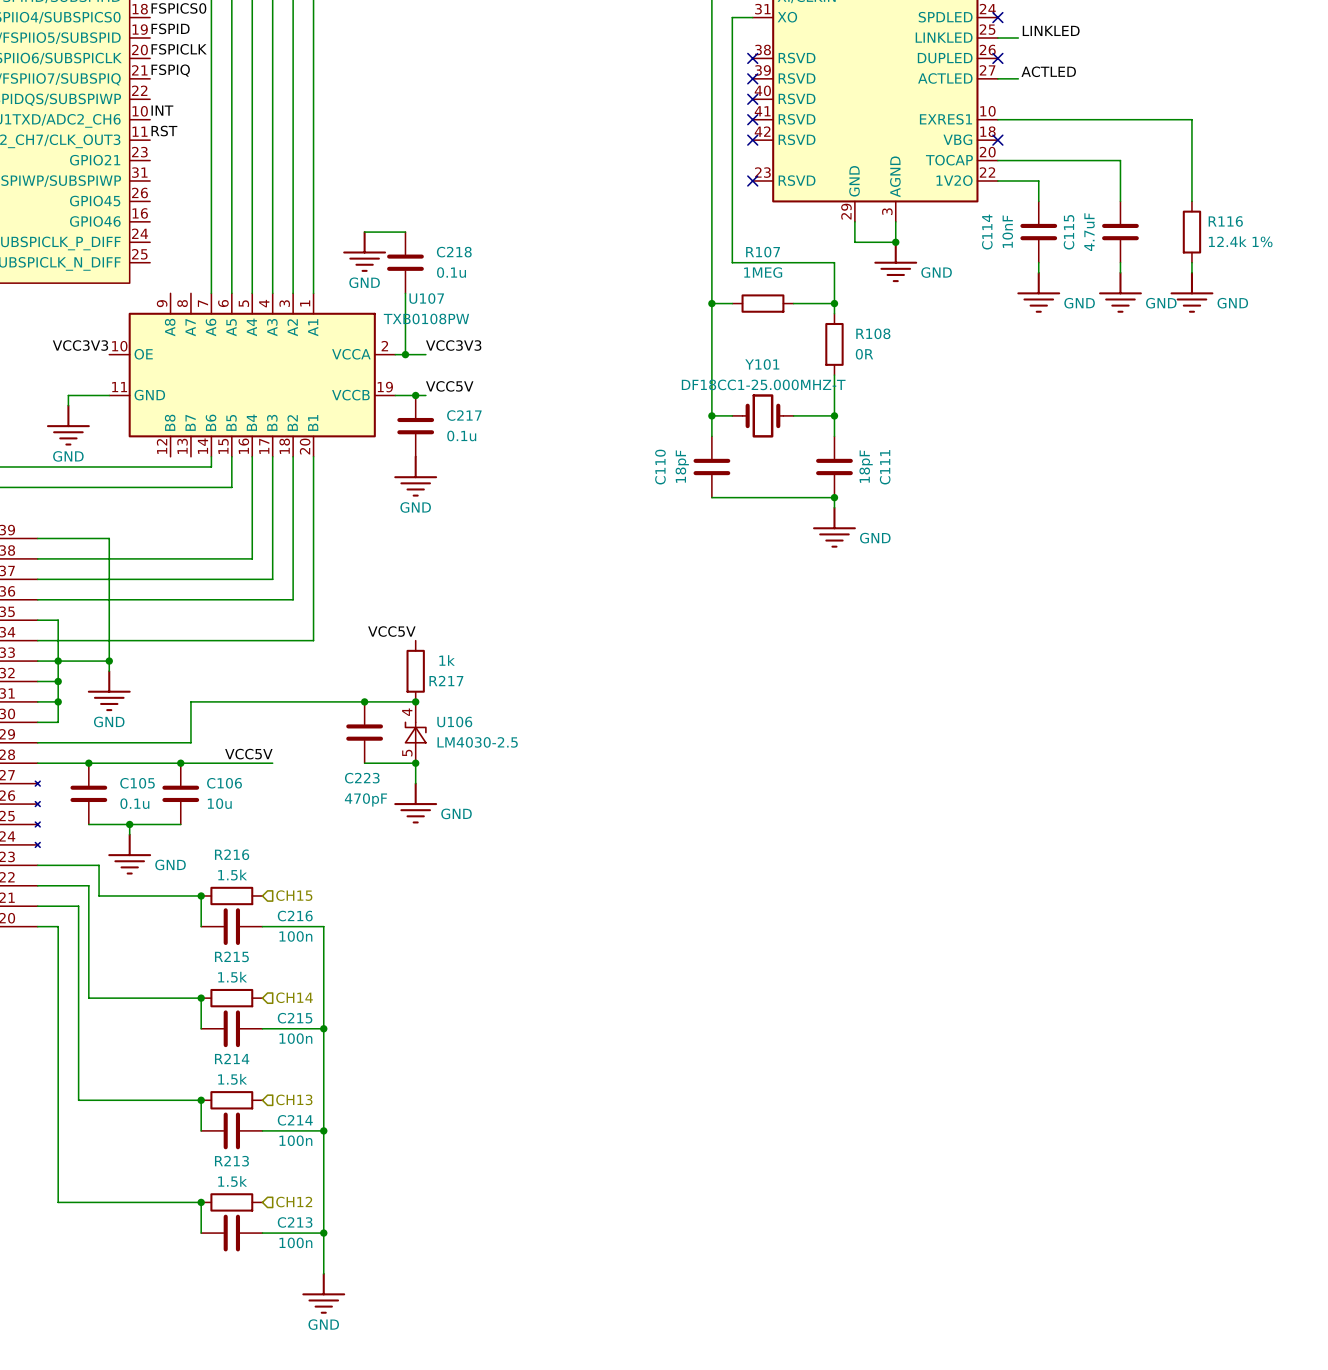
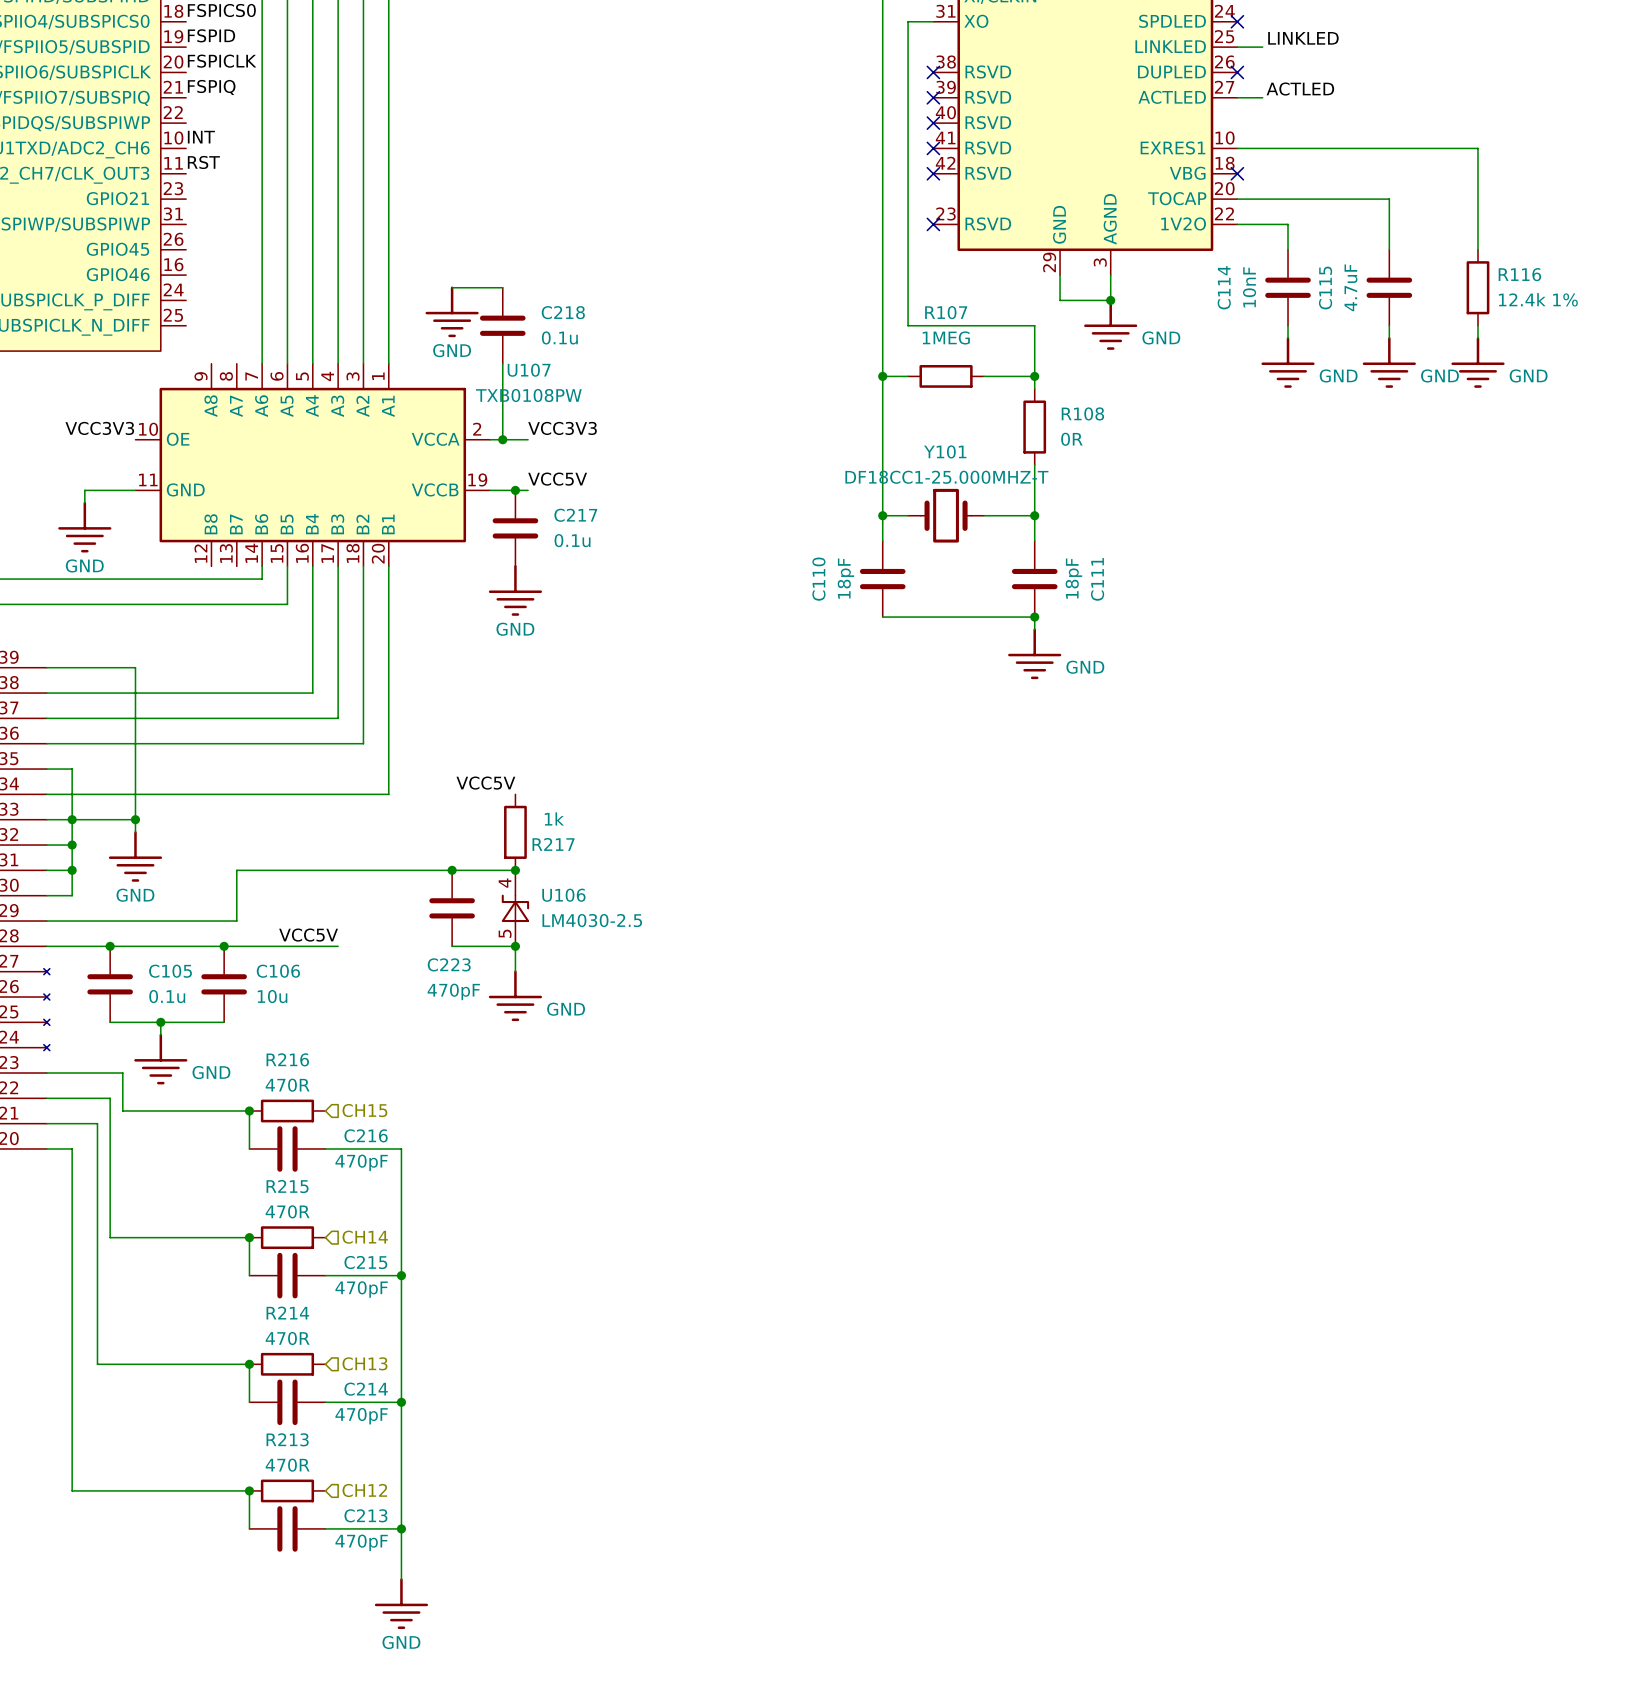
R216 value: 1.5k (232, 875) -> 470R (287, 1085)
C216 value: 100n (295, 936) -> 470pF (361, 1162)
R215 value: 1.5k (232, 977) -> 470R (287, 1211)
C215 value: 100n (295, 1038) -> 470pF (361, 1289)
R214 value: 1.5k (232, 1079) -> 470R (287, 1338)
C214 value: 100n (295, 1140) -> 470pF (361, 1416)
R213 value: 1.5k (232, 1181) -> 470R (287, 1465)
C213 value: 100n (295, 1242) -> 470pF (361, 1542)

